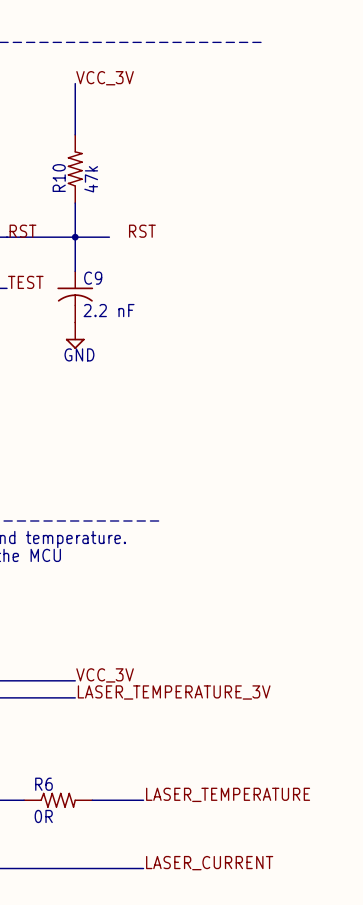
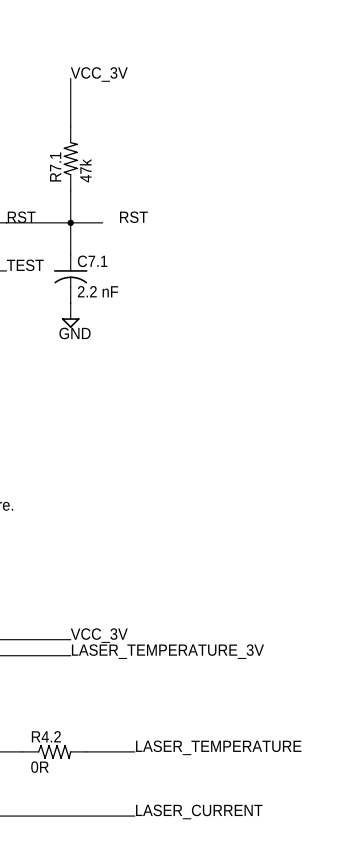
R10 name: R10 (59, 178) -> R7.1 (55, 167)
C9 name: C9 (93, 278) -> C7.1 (92, 261)
R6 name: R6 (43, 784) -> R4.2 (46, 736)

